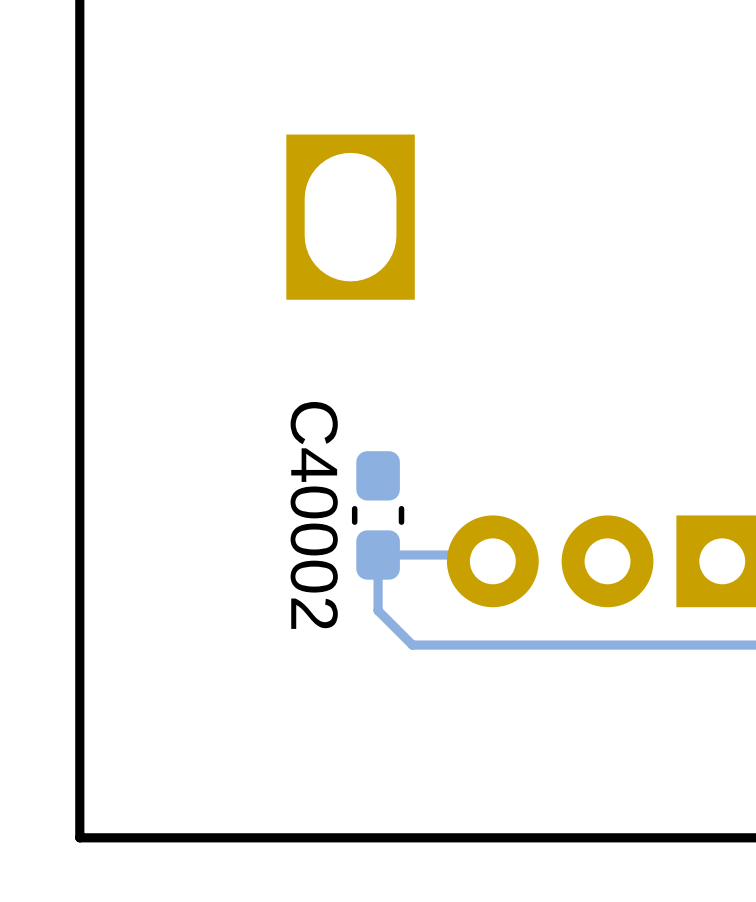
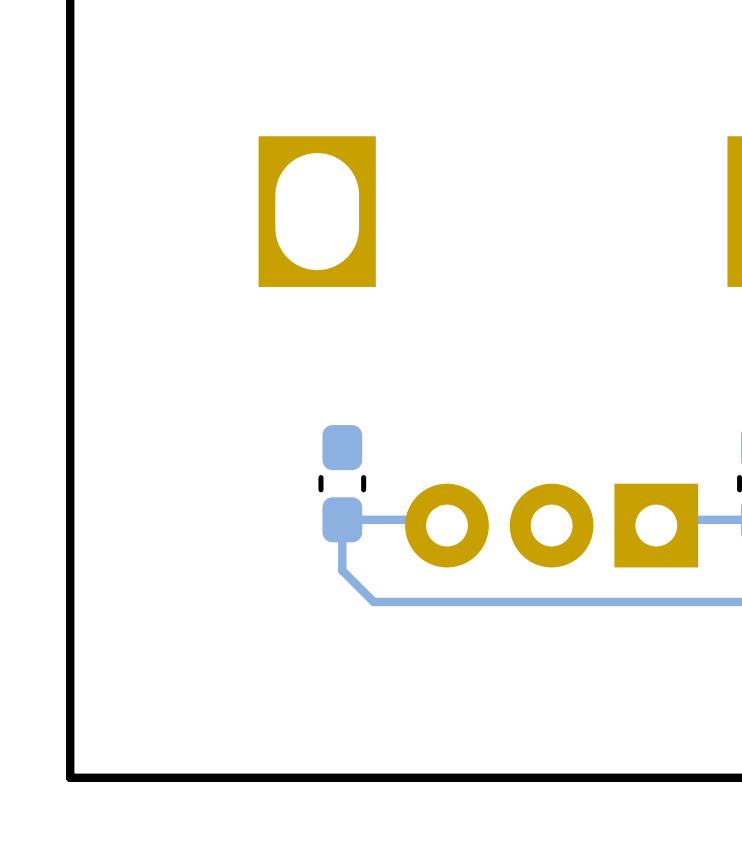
C40002 name: C40002 (314, 515) -> none

